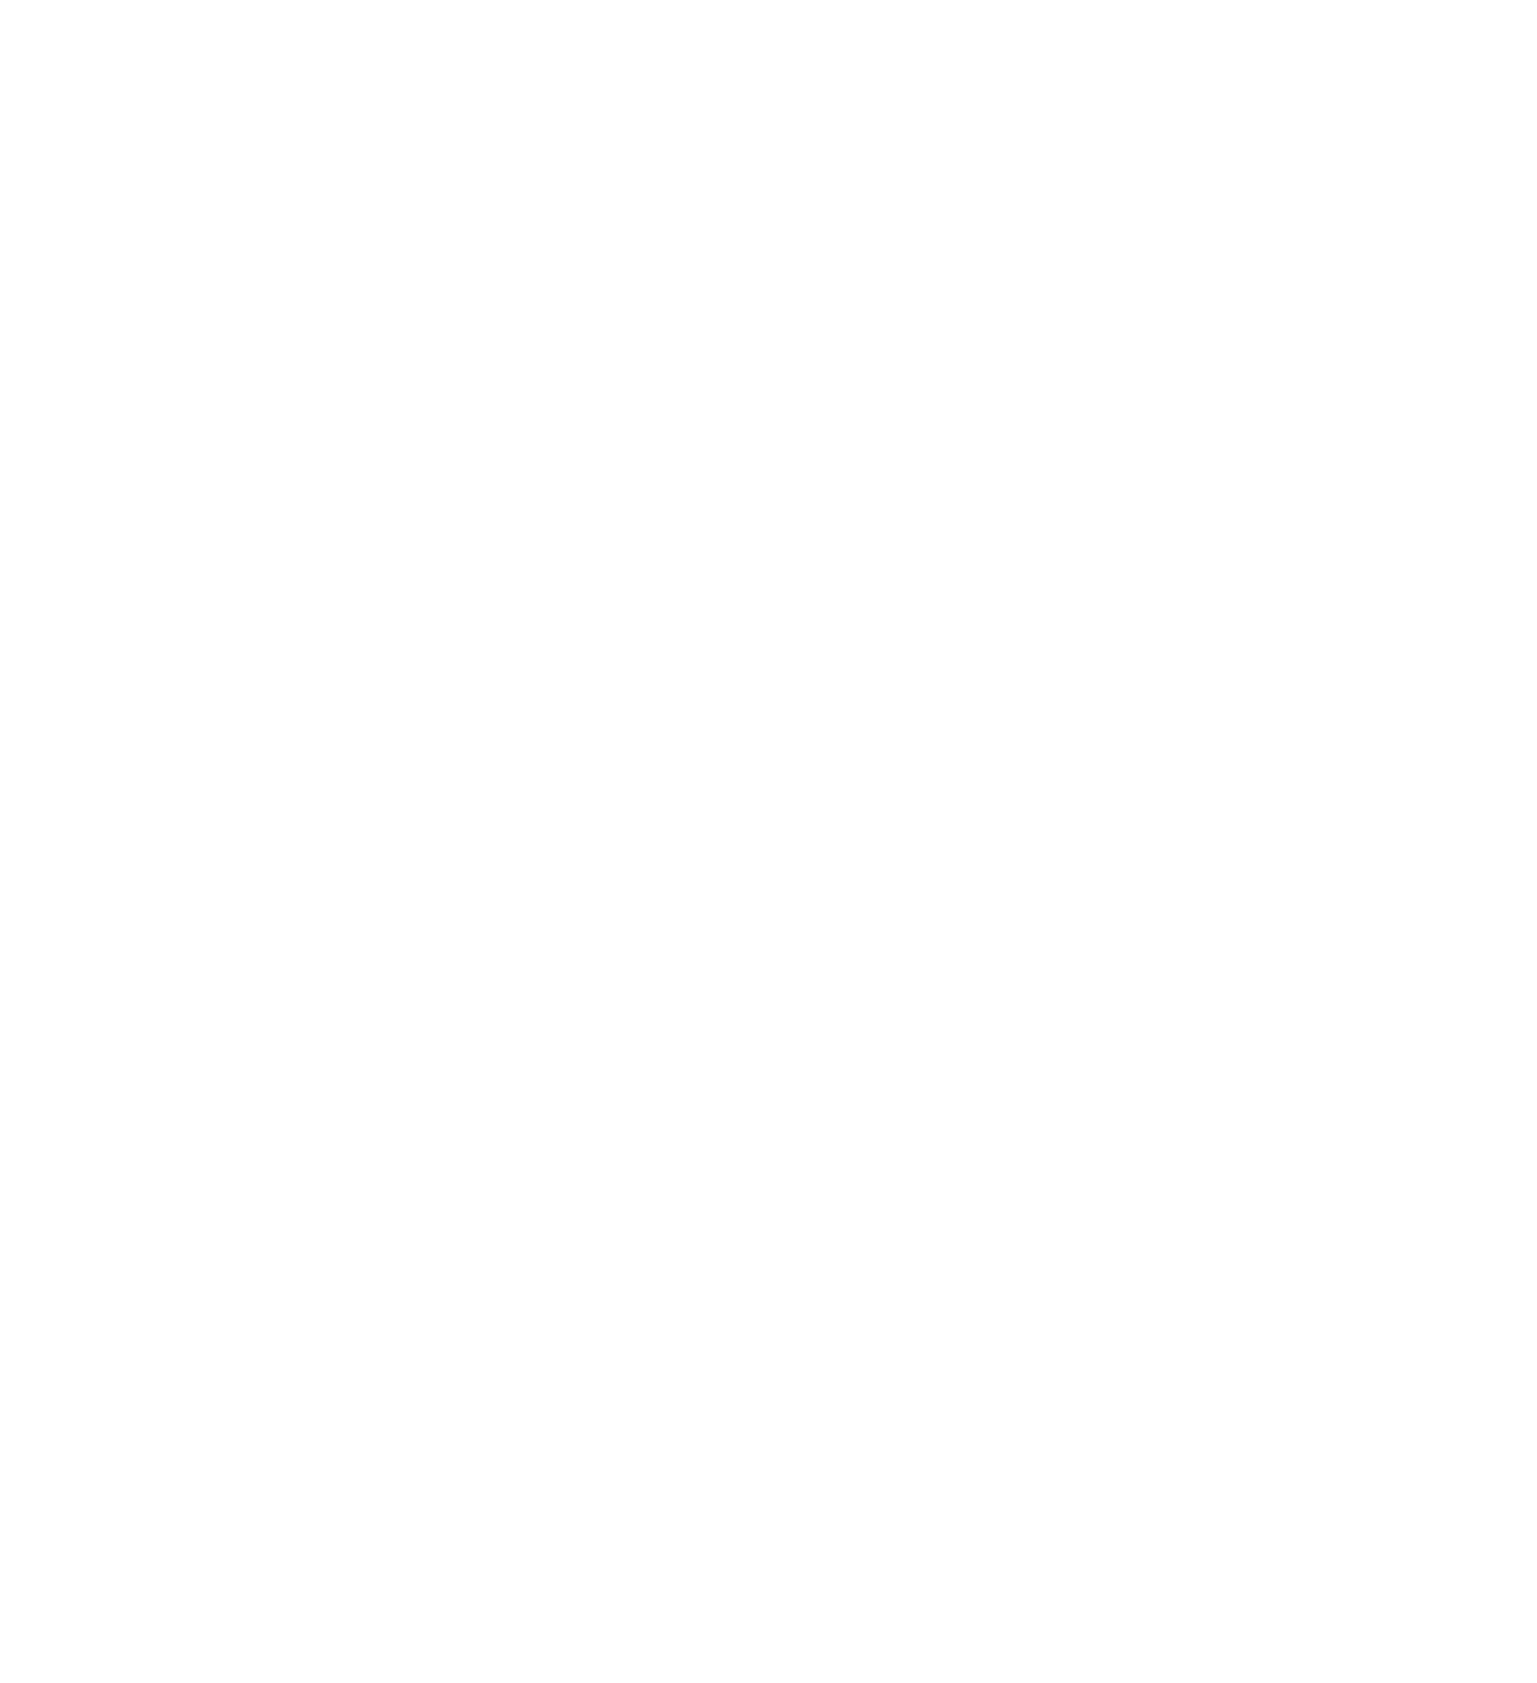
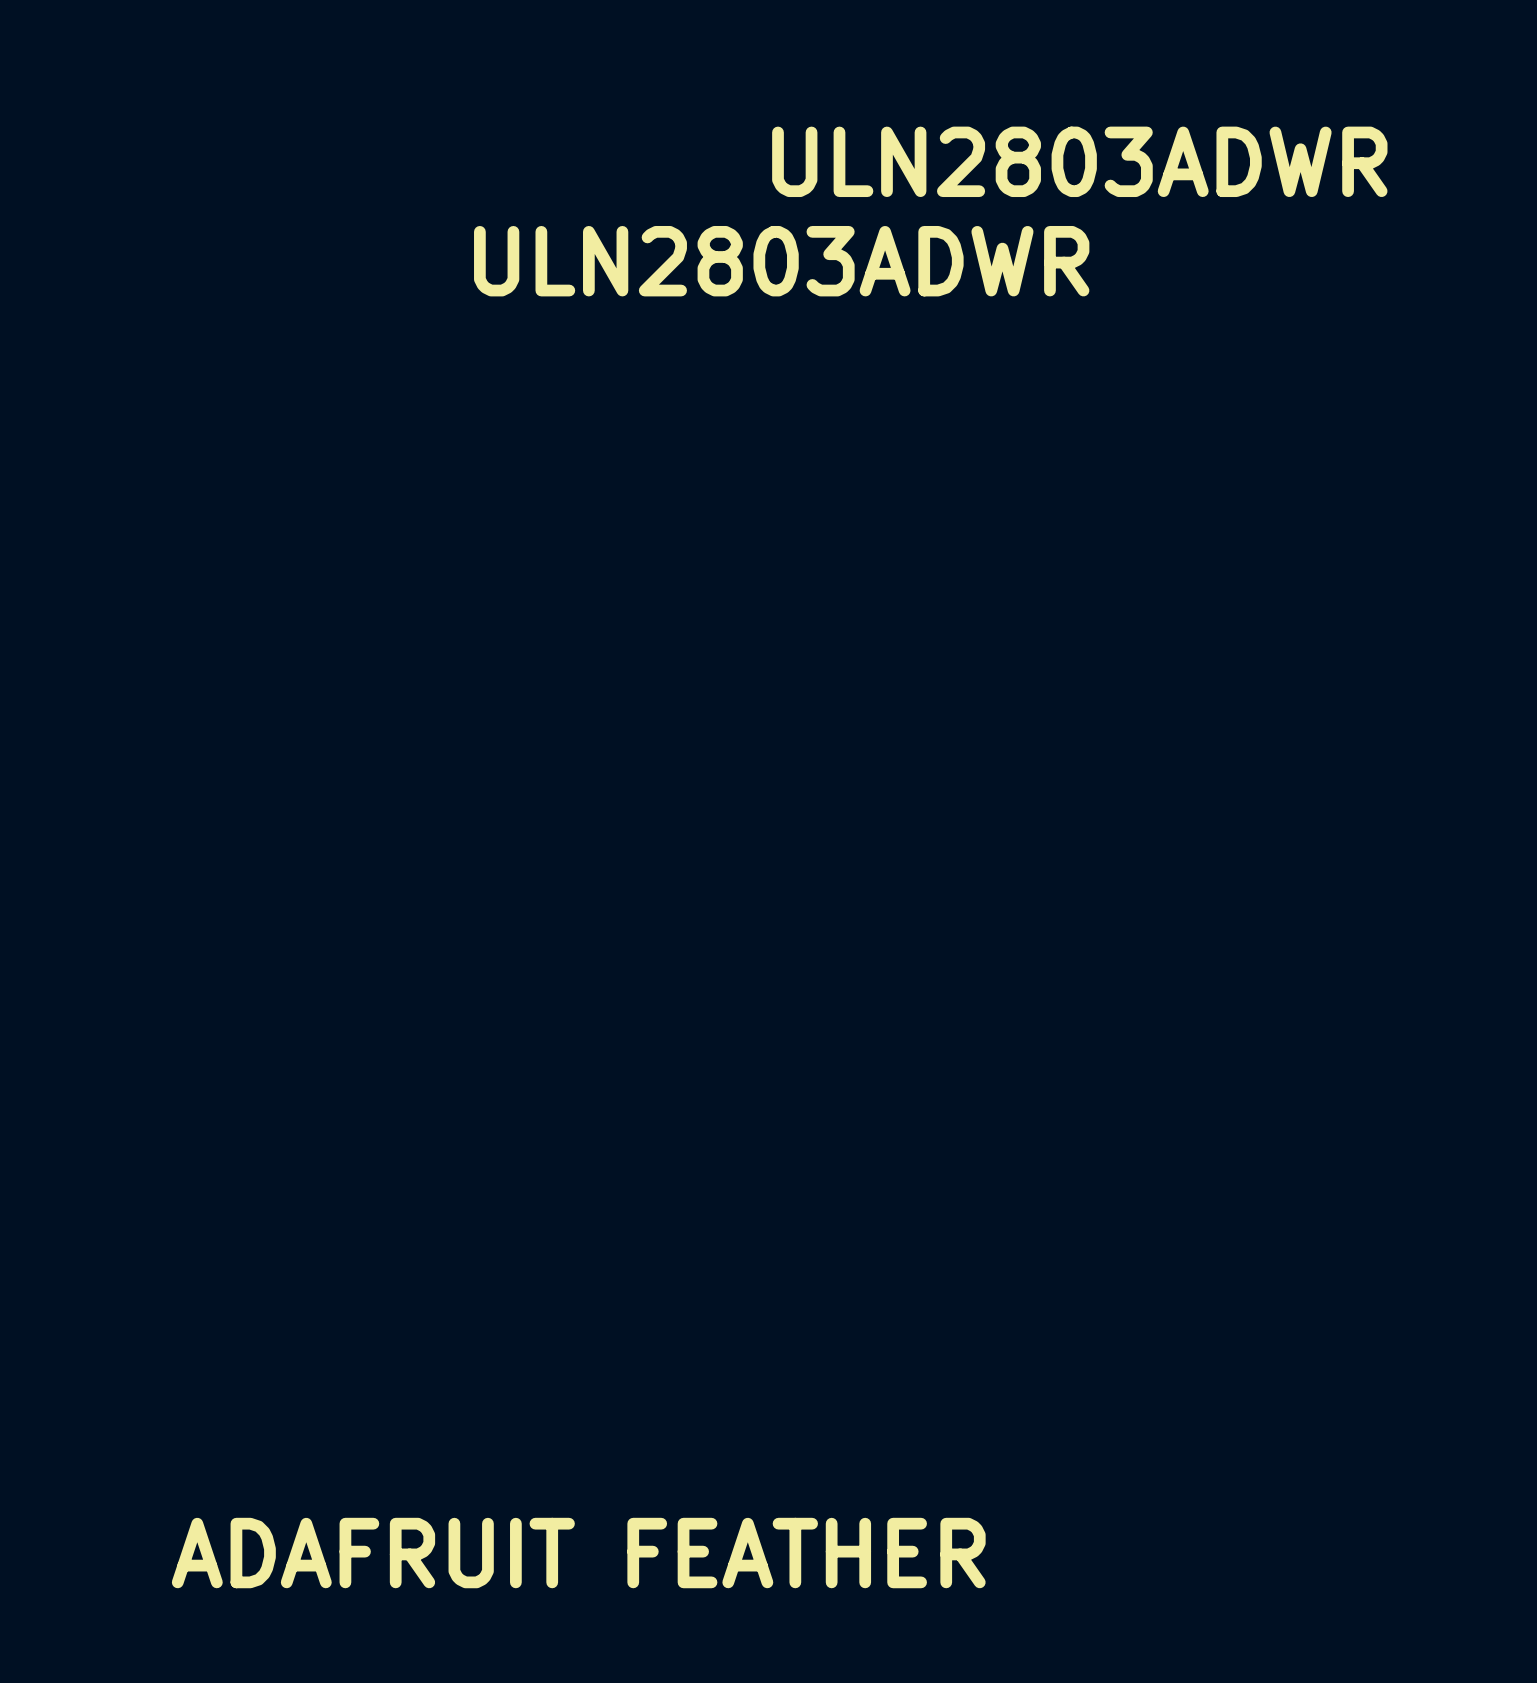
text: none -> ULN2803ADWR (1079, 161)
text: none -> ULN2803ADWR (781, 261)
text: none -> ADAFRUIT FEATHER (578, 1553)

